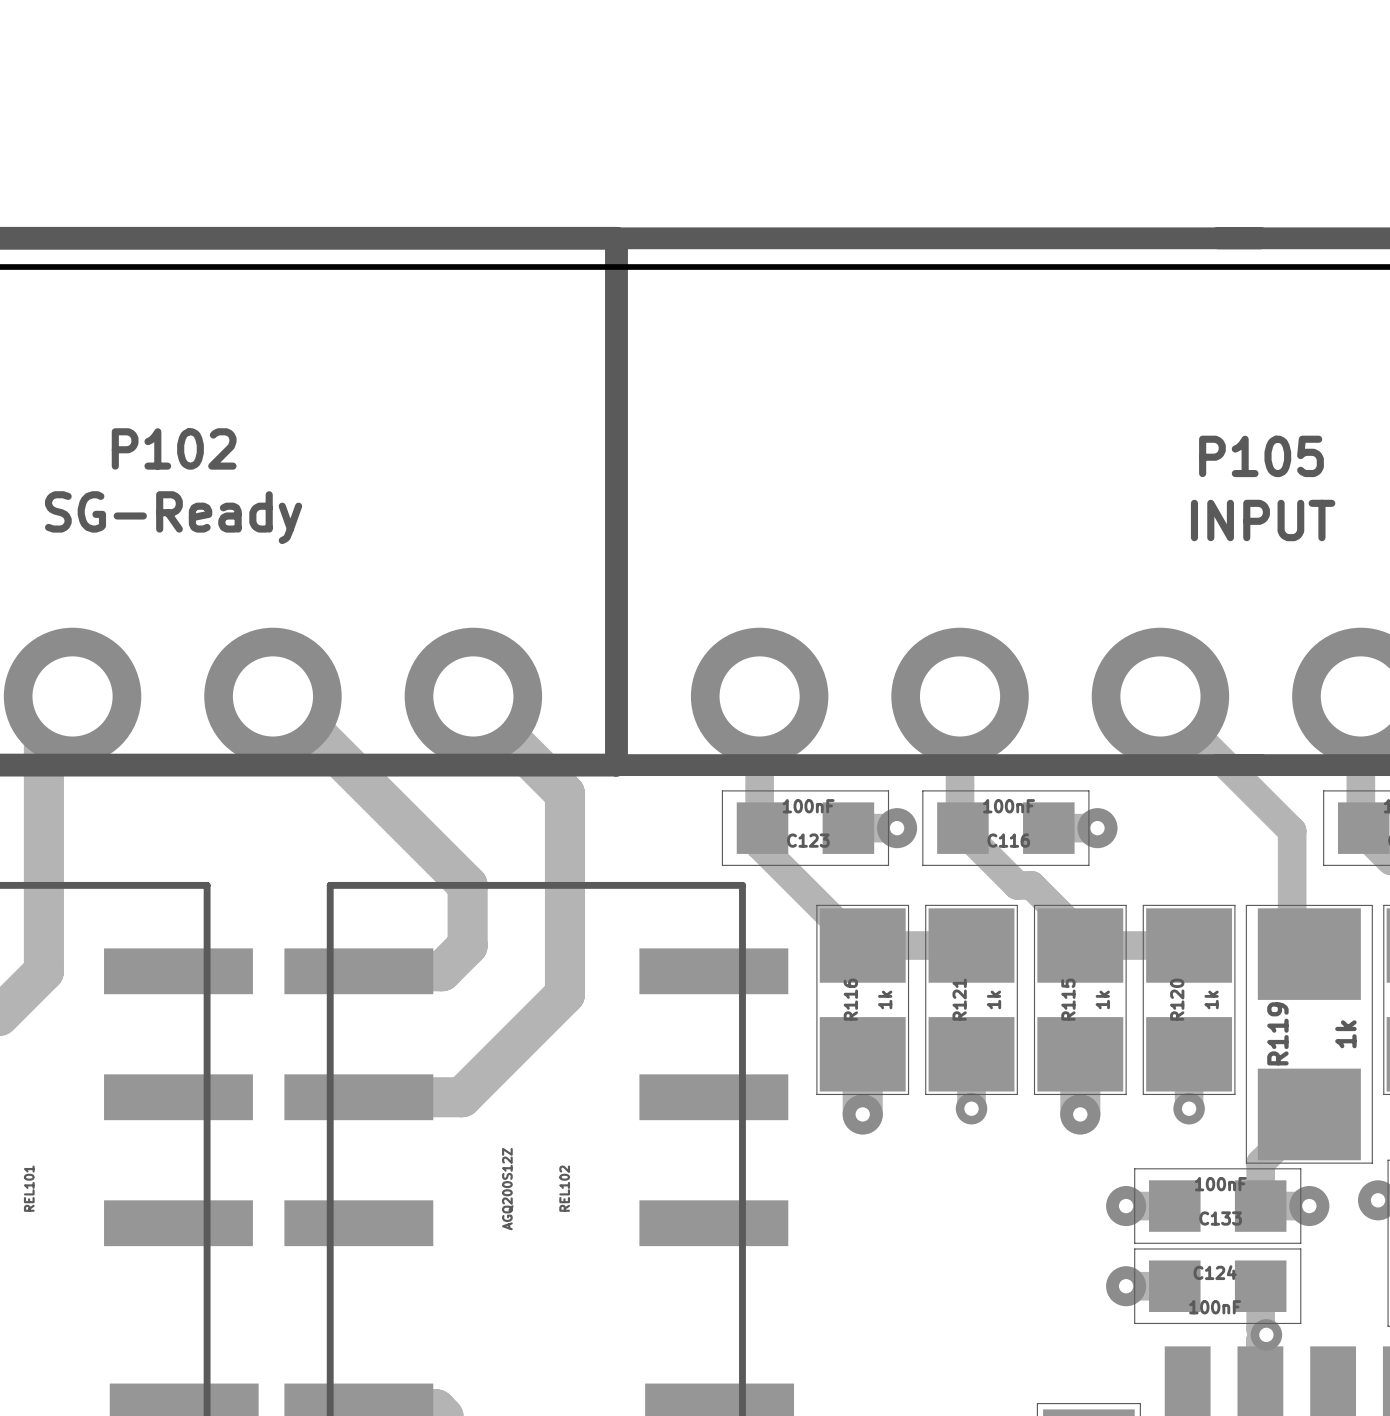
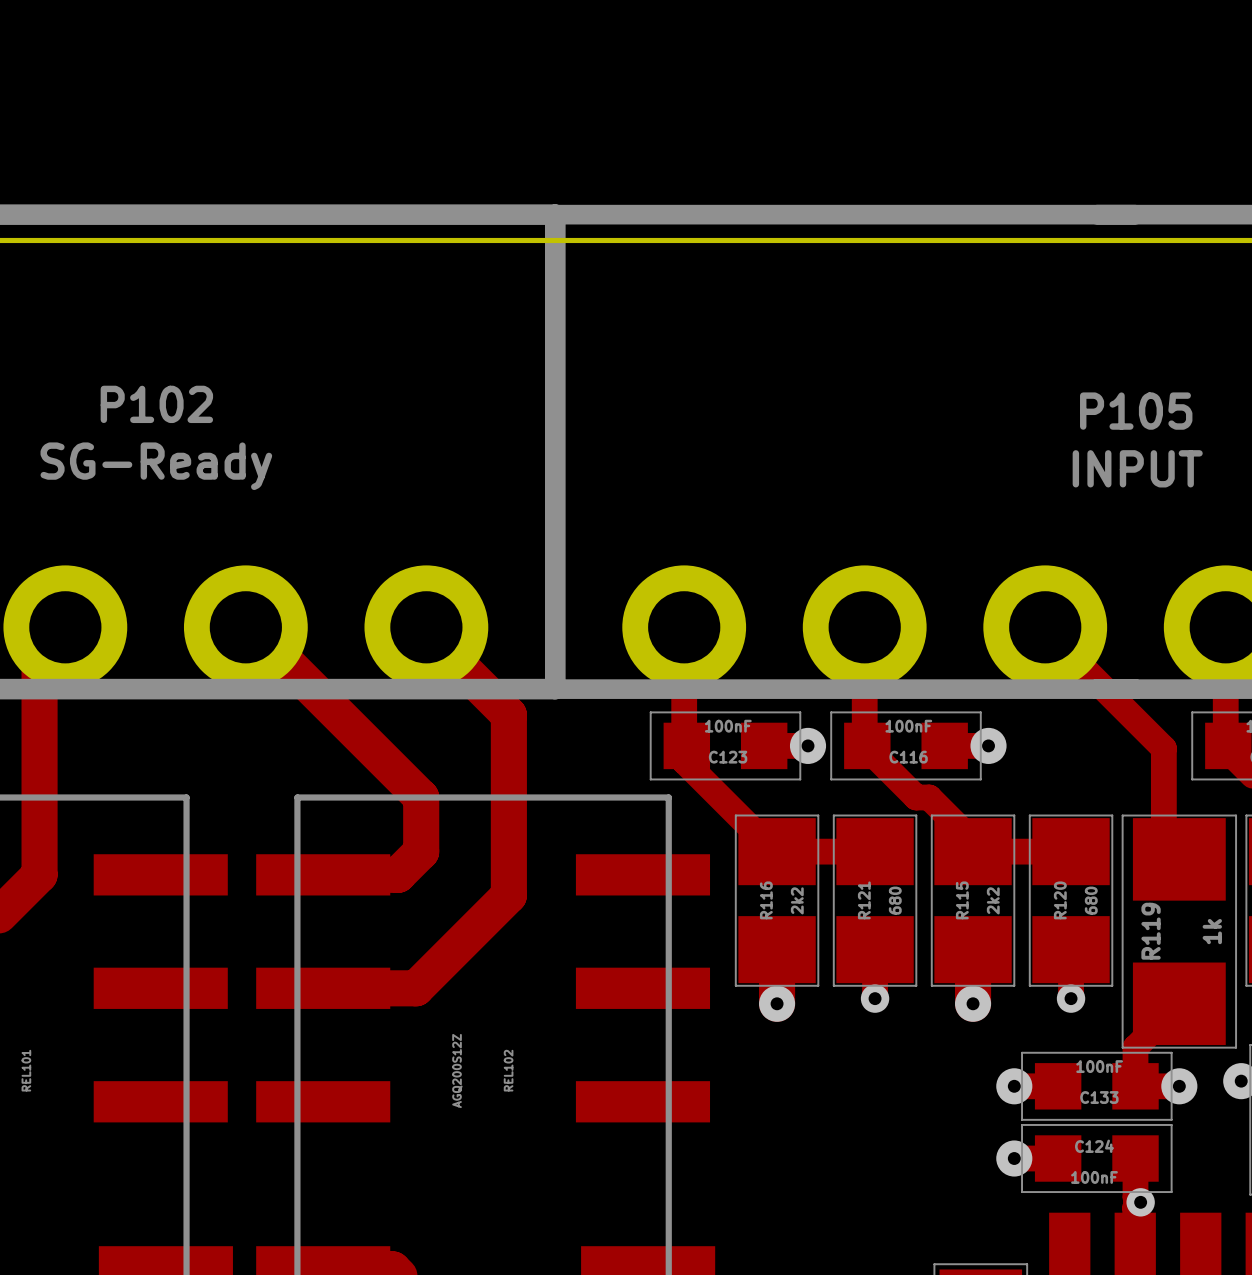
R116 value: 1k (885, 999) -> 2k2 (797, 900)
R121 value: 1k (993, 999) -> 680 (895, 900)
R115 value: 1k (1102, 999) -> 2k2 (993, 900)
R120 value: 1k (1211, 999) -> 680 (1091, 900)

